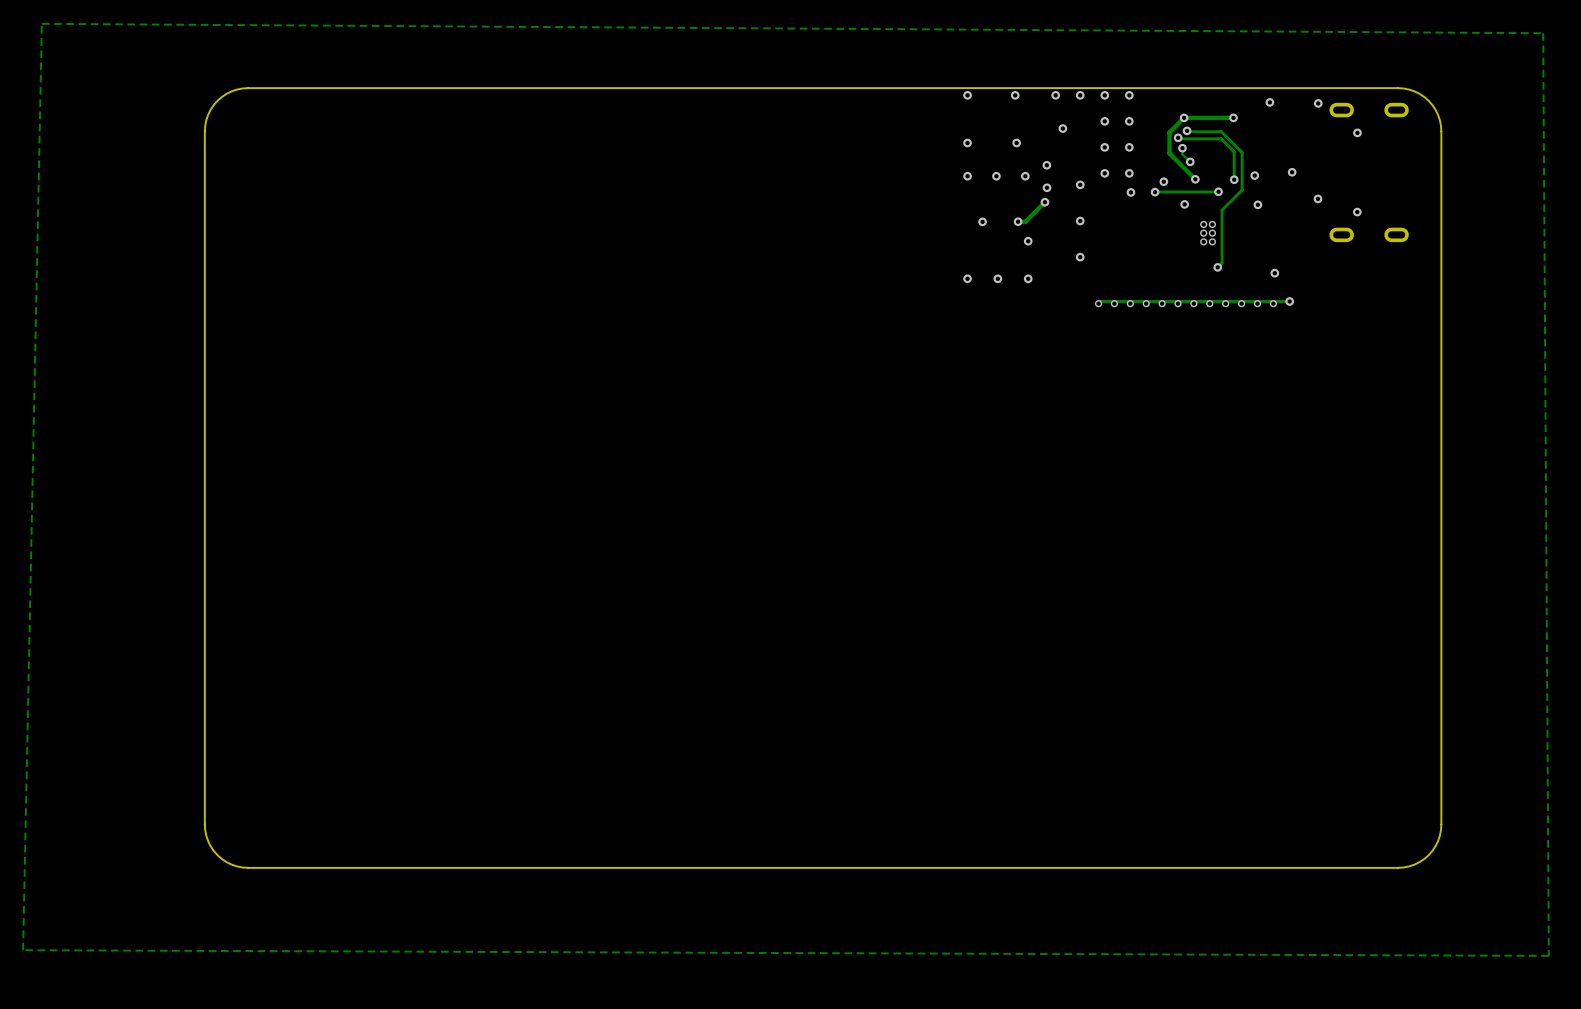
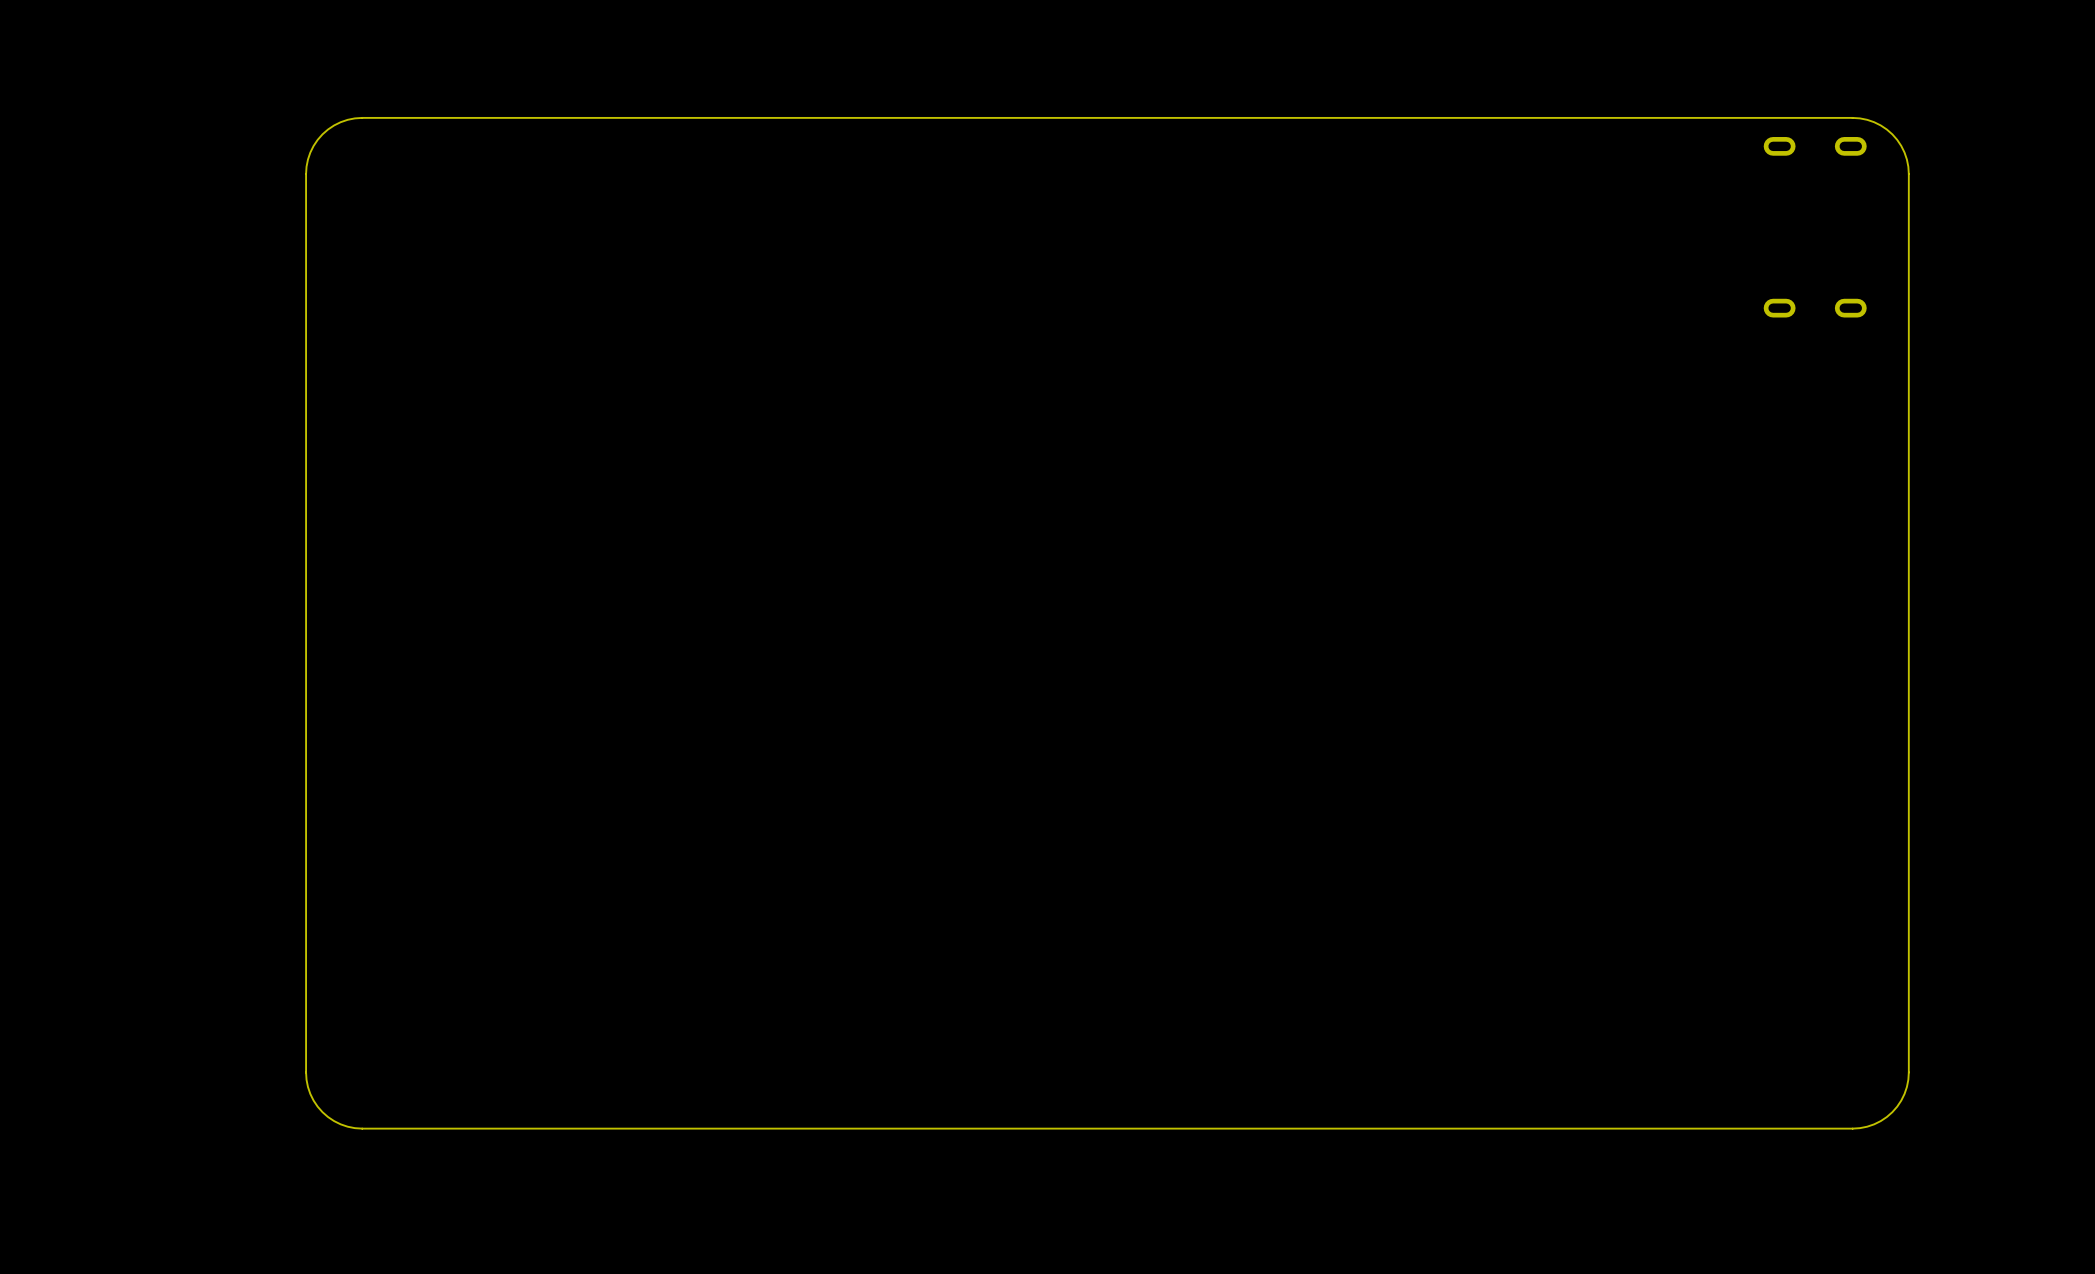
zone outline: (41, 23) (23, 950) (1548, 955) (1543, 33) (41, 23) -> none
via: (967, 95) -> none
via: (1015, 95) -> none
via: (1055, 95) -> none
via: (1080, 95) -> none
via: (1104, 95) -> none
via: (1129, 95) -> none
via: (1269, 102) -> none
via: (1318, 103) -> none
via: (1184, 117) -> none
track: (1233, 117) (1184, 117) (1169, 132) (1169, 153) (1195, 179) -> none
via: (1233, 117) -> none
via: (1104, 121) -> none
via: (1129, 121) -> none
via: (1062, 128) -> none
track: (1187, 130) (1221, 131) (1242, 152) (1242, 190) (1222, 210) (1222, 263) (1217, 267) -> none
via: (1187, 130) -> none
via: (1357, 132) -> none
track: (1178, 137) (1221, 138) (1234, 151) (1234, 179) -> none
via: (1178, 137) -> none
via: (967, 143) -> none
via: (1016, 143) -> none
via: (1104, 147) -> none
via: (1129, 147) -> none
track: (1182, 148) (1182, 154) (1190, 161) -> none
via: (1182, 148) -> none
via: (1190, 161) -> none
via: (1046, 165) -> none
via: (1292, 172) -> none
via: (1104, 173) -> none
via: (1129, 173) -> none
via: (1254, 175) -> none
via: (967, 176) -> none
via: (996, 176) -> none
via: (1025, 176) -> none
via: (1195, 179) -> none
via: (1234, 179) -> none
via: (1163, 181) -> none
via: (1080, 184) -> none
via: (1047, 187) -> none
track: (1218, 191) (1155, 191) -> none
via: (1218, 191) -> none
via: (1130, 192) -> none
via: (1155, 192) -> none
via: (1317, 198) -> none
track: (1044, 202) (1025, 221) (1018, 221) -> none
via: (1044, 202) -> none
via: (1184, 204) -> none
via: (1257, 204) -> none
via: (1357, 212) -> none
via: (982, 221) -> none
via: (1018, 221) -> none
via: (1080, 221) -> none
via: (1203, 224) -> none
via: (1212, 224) -> none
via: (1203, 233) -> none
via: (1212, 233) -> none
via: (1028, 241) -> none
via: (1203, 241) -> none
via: (1212, 241) -> none
via: (1080, 257) -> none
via: (1217, 267) -> none
via: (1274, 273) -> none
via: (967, 278) -> none
via: (997, 278) -> none
via: (1028, 278) -> none
track: (1289, 301) (1100, 301) (1098, 303) -> none
via: (1289, 301) -> none
via: (1098, 303) -> none
via: (1114, 303) -> none
via: (1130, 303) -> none
via: (1146, 303) -> none
via: (1162, 303) -> none
via: (1178, 303) -> none
via: (1193, 303) -> none
via: (1209, 303) -> none
via: (1225, 303) -> none
via: (1241, 303) -> none
via: (1257, 303) -> none
via: (1273, 303) -> none

